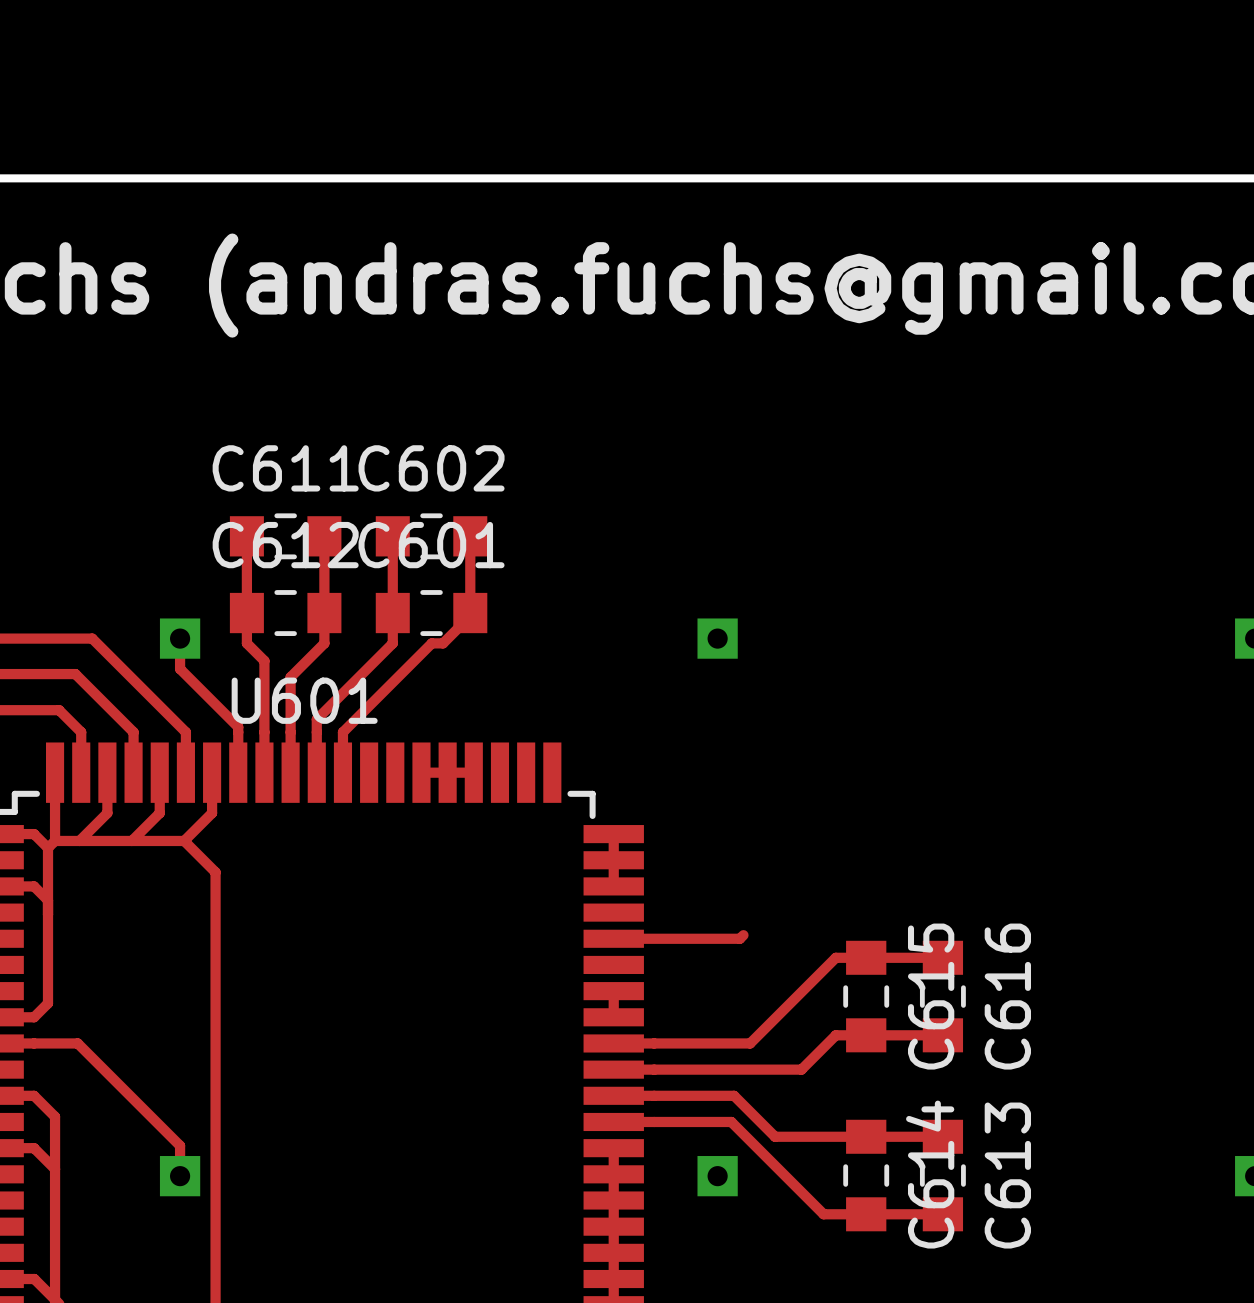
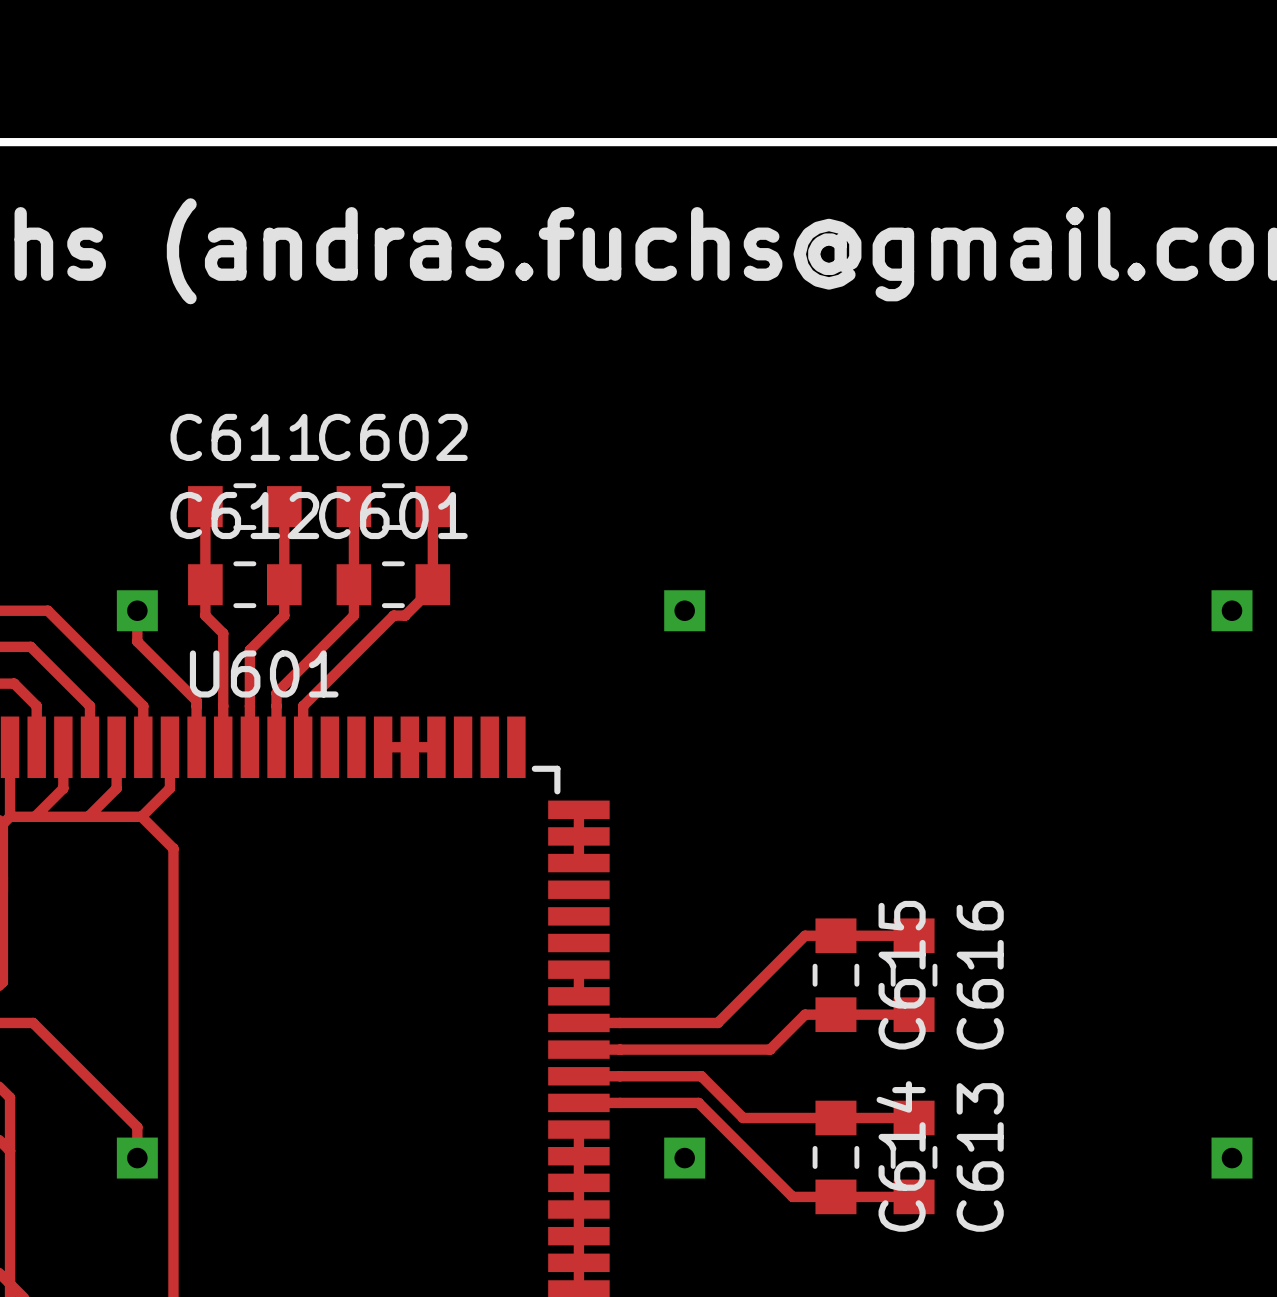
track: (743, 935) (739, 938) (613, 938) -> none

